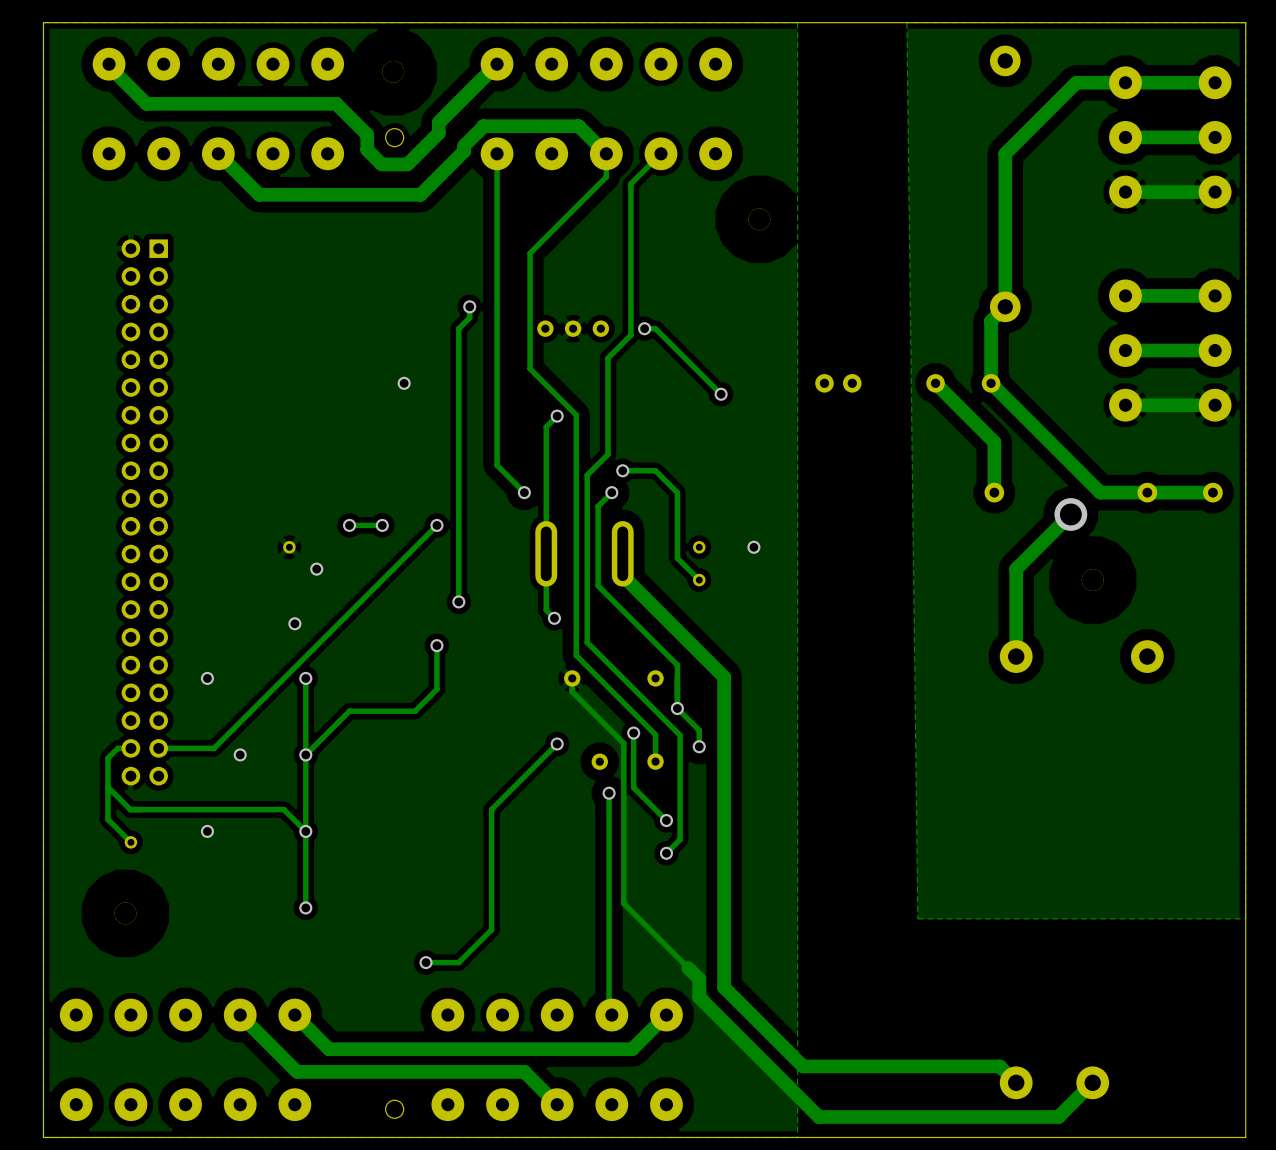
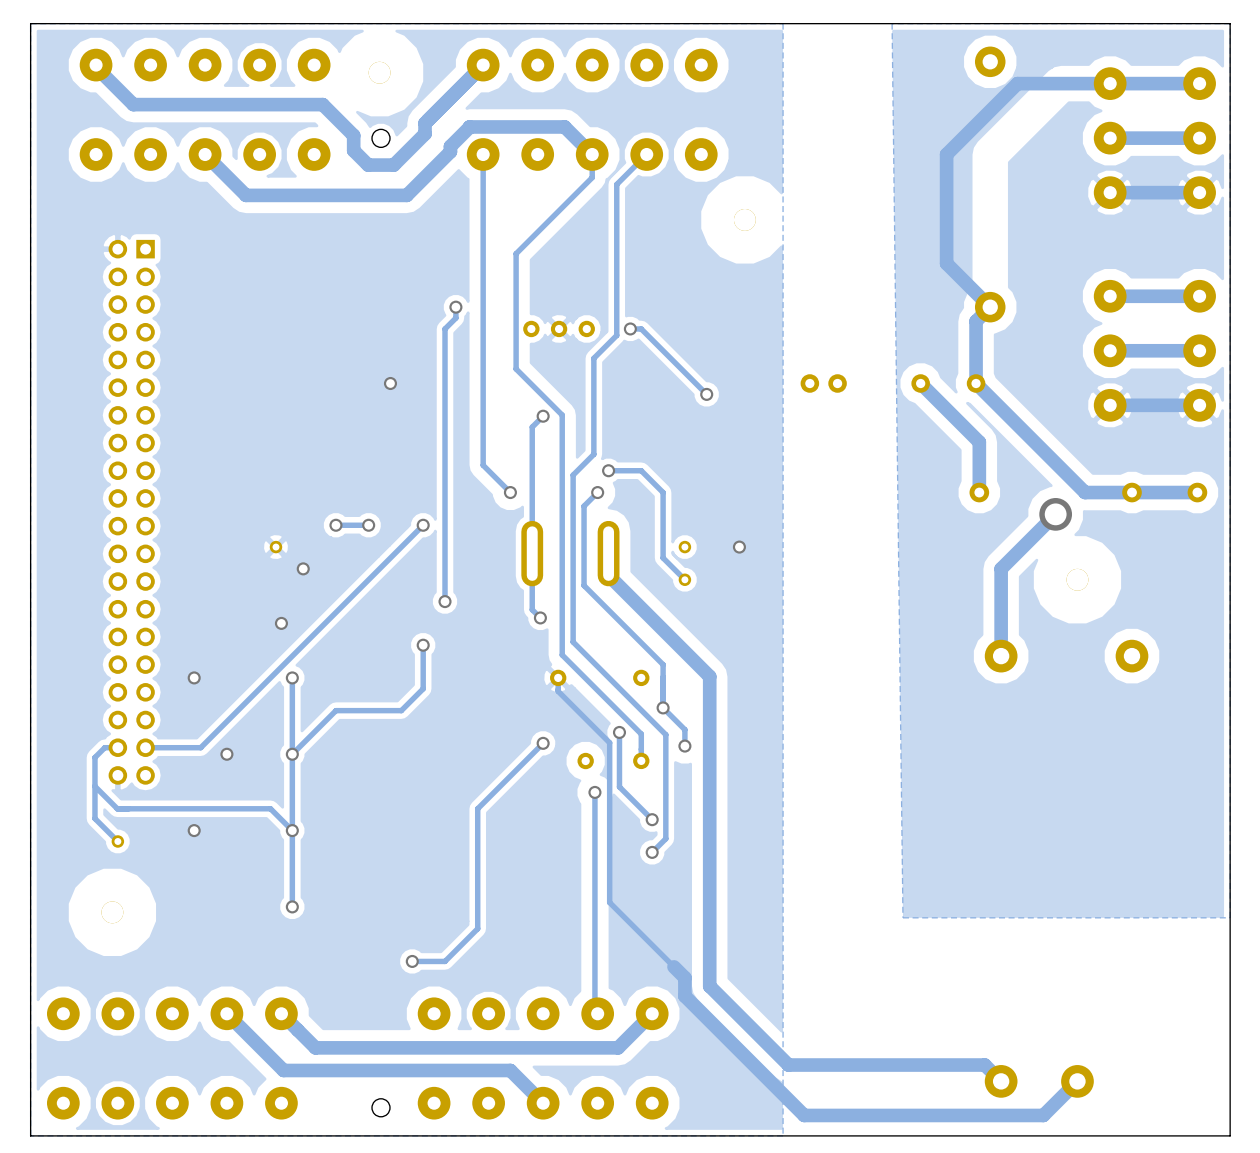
track: (1076, 82) (1005, 153) (1005, 306) -> (1061, 83) (1017, 83) (946, 154) (946, 263) (990, 307)

